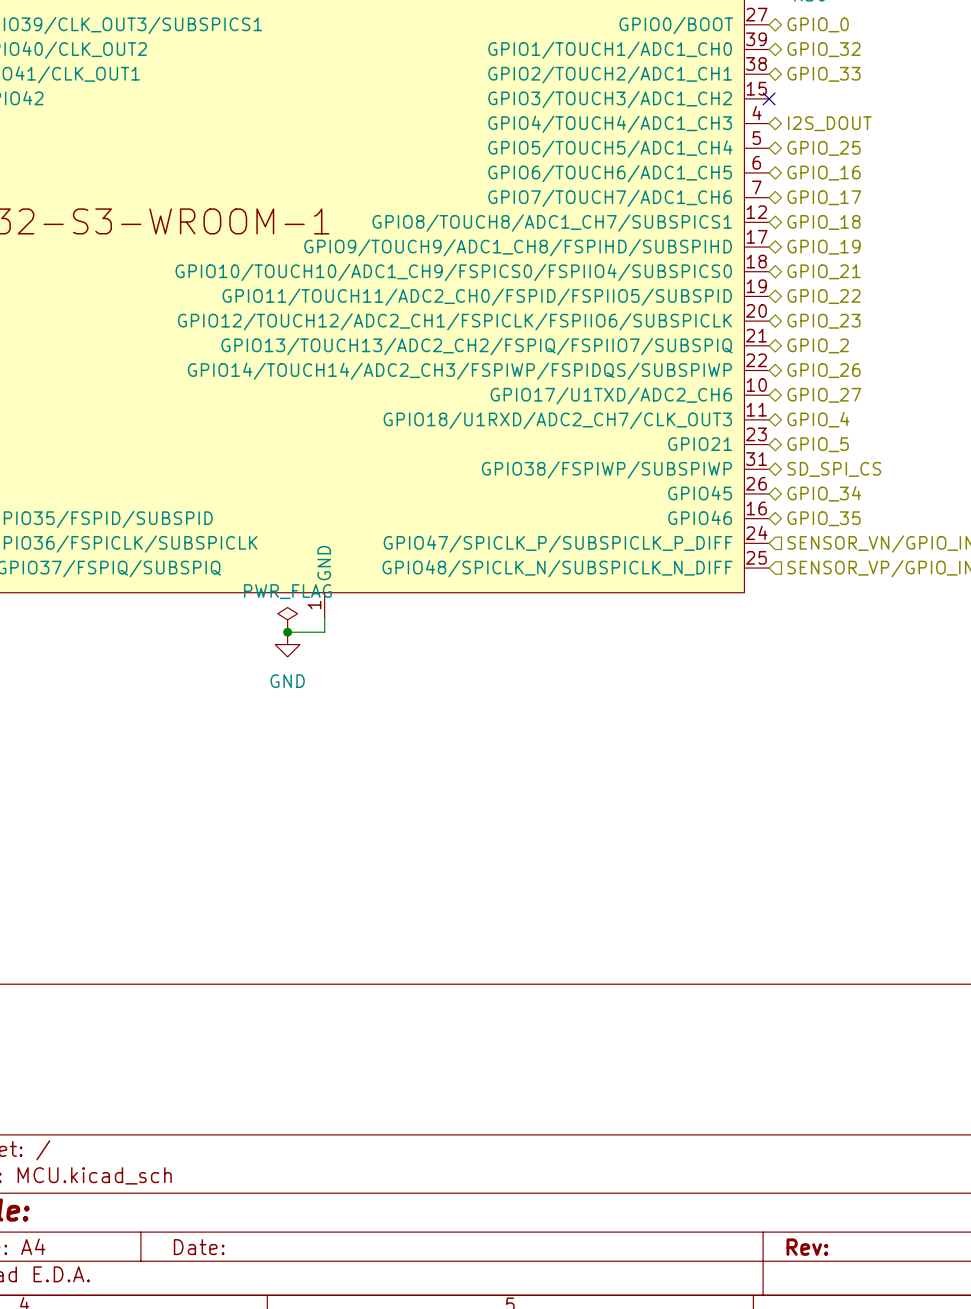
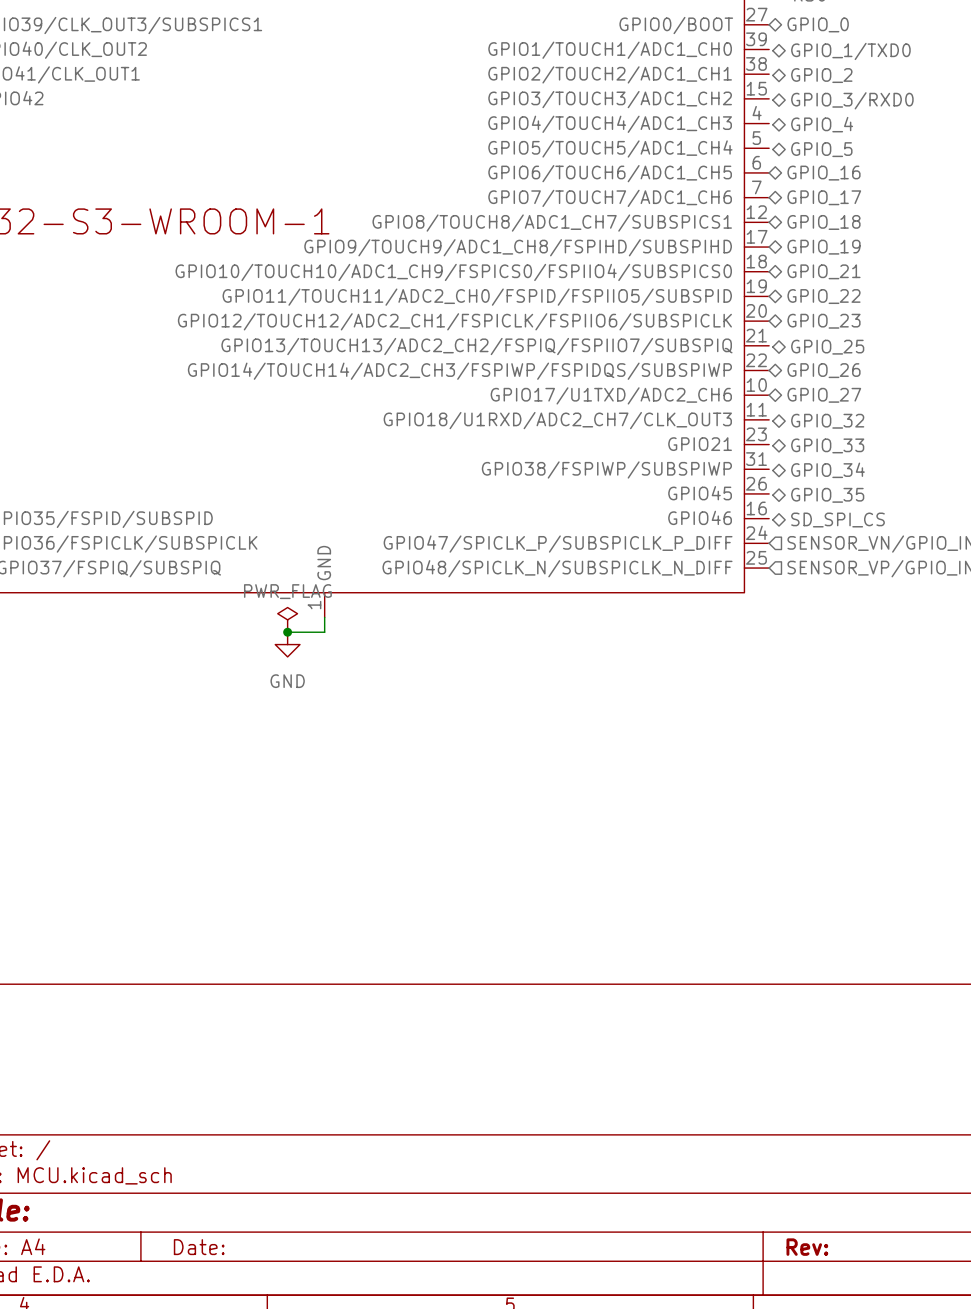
hierarchical label: GPIO_32 (823, 49) -> GPIO_1/TXD0 (850, 51)
hierarchical label: GPIO_33 (823, 74) -> GPIO_2 (821, 75)
no-connect mark: (769, 98) -> none
hierarchical label: none -> GPIO_3/RXD0 (852, 100)
hierarchical label: I2S_DOUT (829, 123) -> GPIO_4 (822, 124)
hierarchical label: GPIO_25 (823, 148) -> GPIO_5 (821, 149)
hierarchical label: GPIO_2 (818, 345) -> GPIO_25 (827, 347)
hierarchical label: GPIO_4 (818, 419) -> GPIO_32 (827, 421)
hierarchical label: GPIO_5 (818, 444) -> GPIO_33 (827, 445)
hierarchical label: SD_SPI_CS (834, 469) -> GPIO_34 (827, 470)
hierarchical label: GPIO_34 (824, 493) -> GPIO_35 (827, 495)
hierarchical label: GPIO_35 (823, 518) -> SD_SPI_CS (837, 520)

